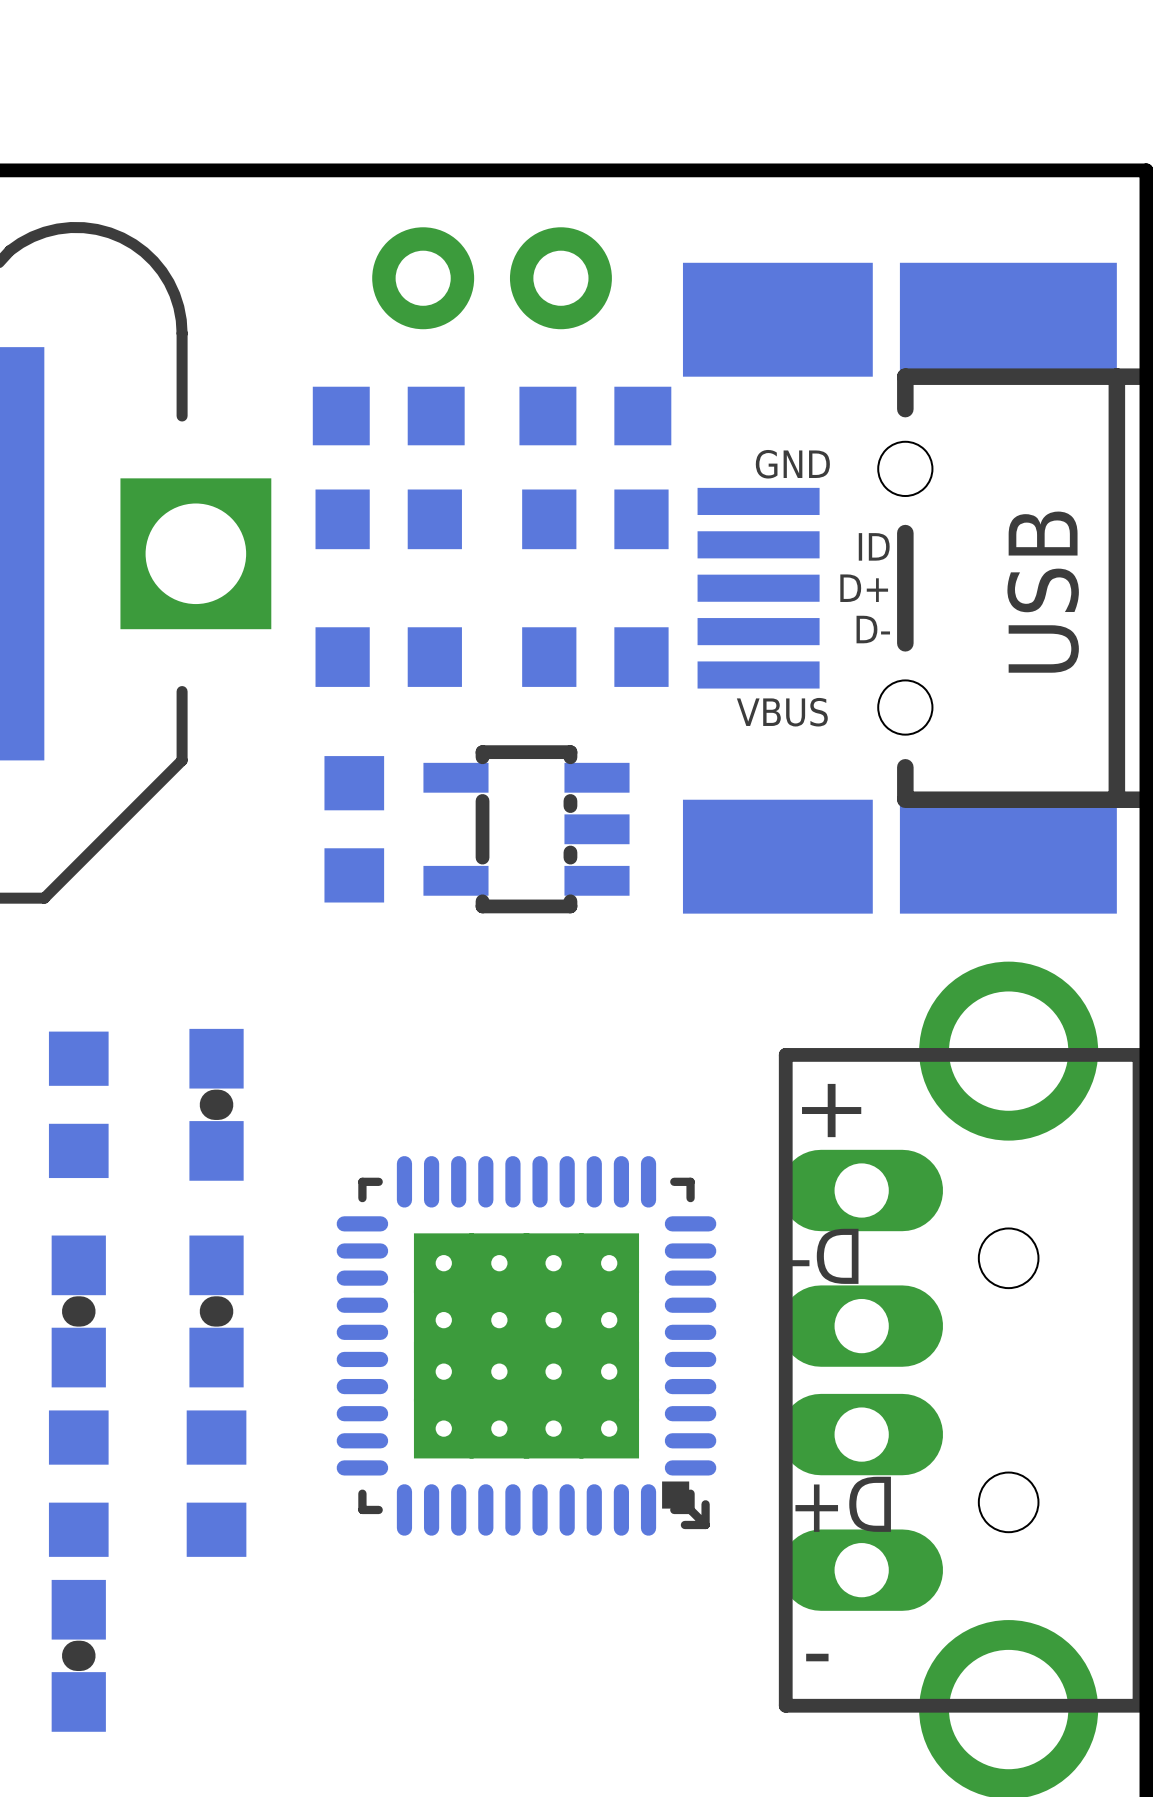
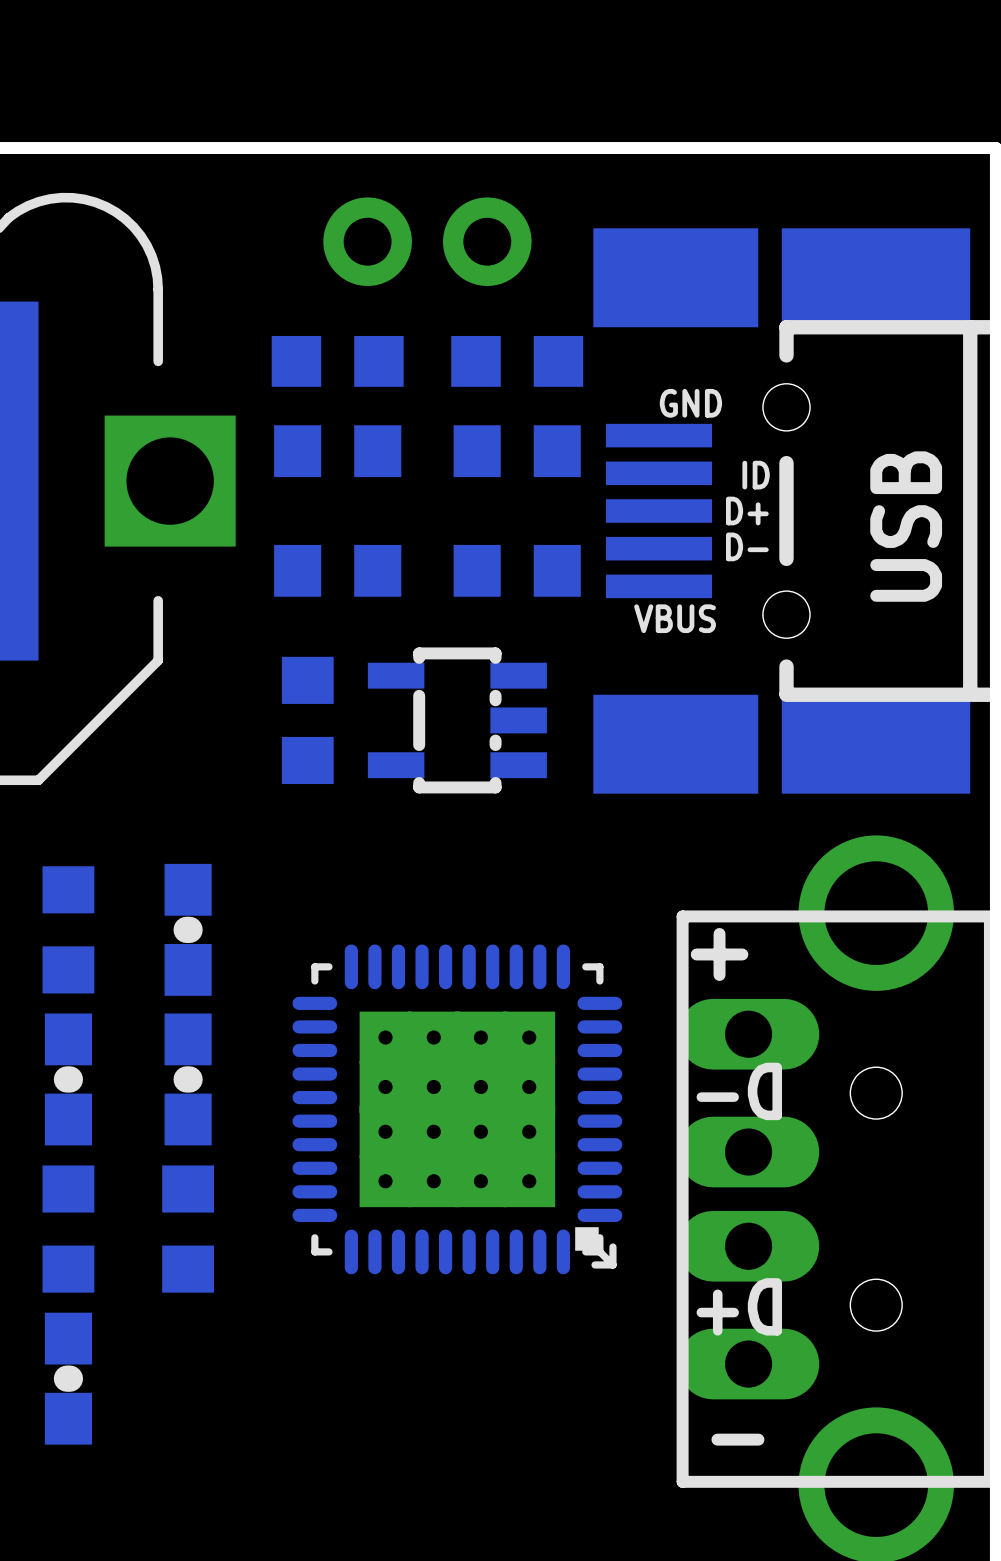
part position: (78, 1104) -> (68, 929)
part position: (216, 1104) -> (188, 929)
part position: (78, 1311) -> (68, 1079)
part position: (216, 1311) -> (188, 1079)
part position: (526, 1345) -> (457, 1109)
part position: (78, 1483) -> (68, 1229)
part position: (216, 1483) -> (188, 1229)
part position: (78, 1655) -> (68, 1378)

